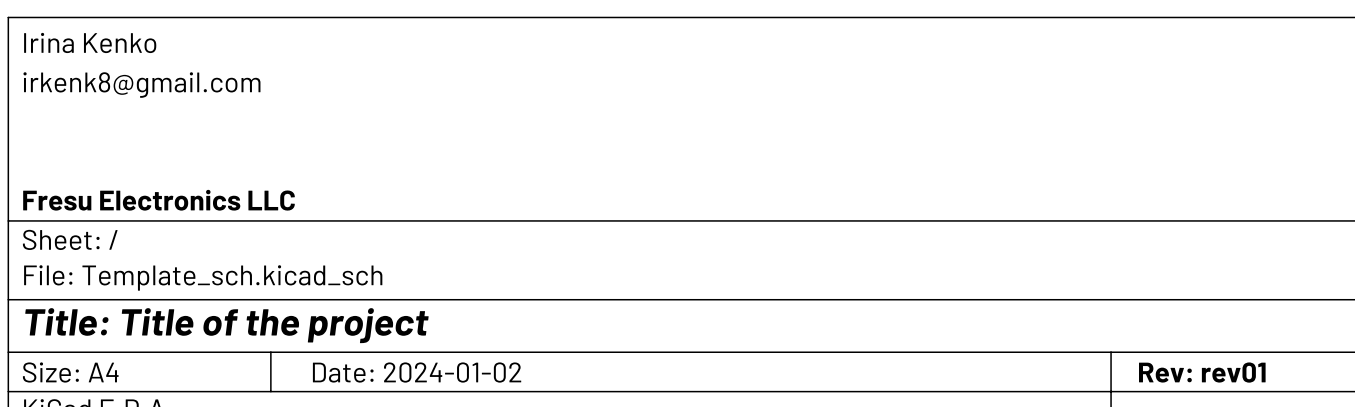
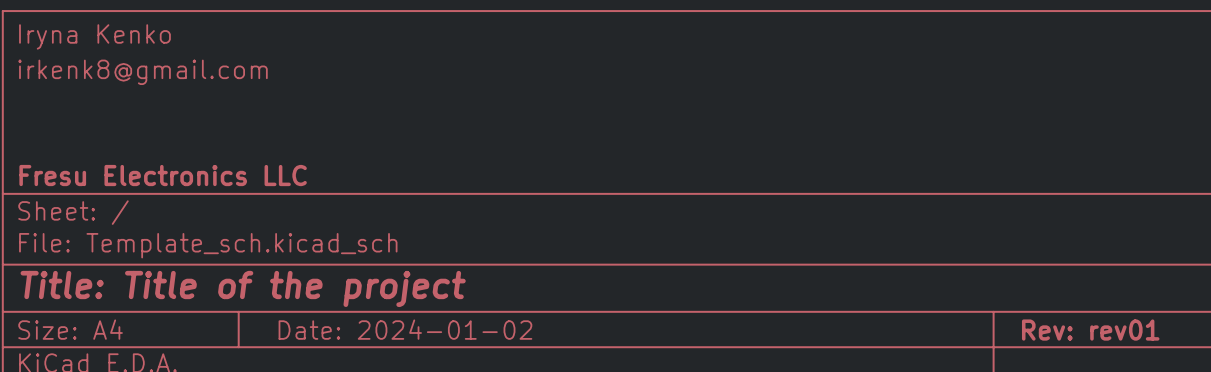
title block: Irina Kenko (90, 42) -> Iryna Kenko (94, 36)

